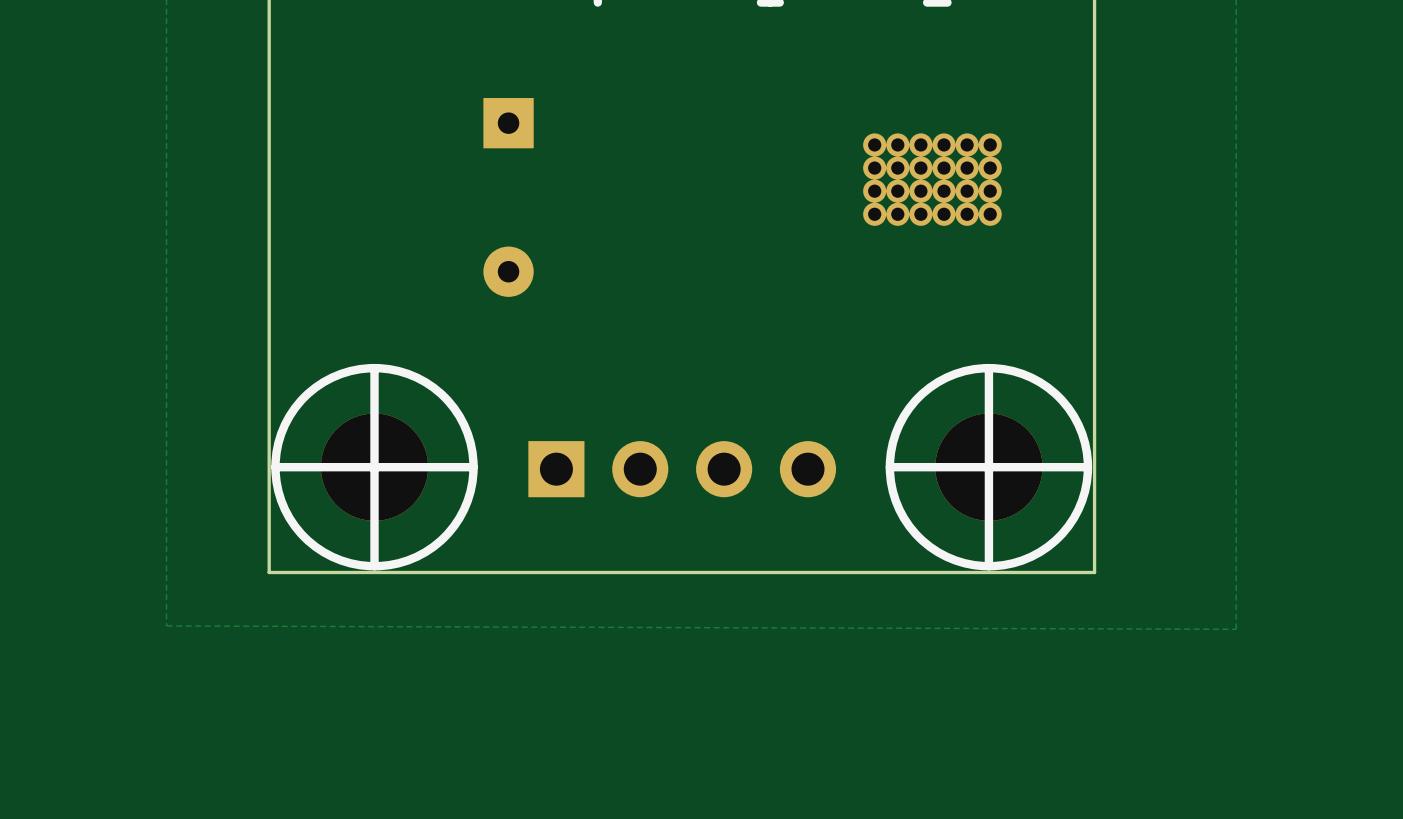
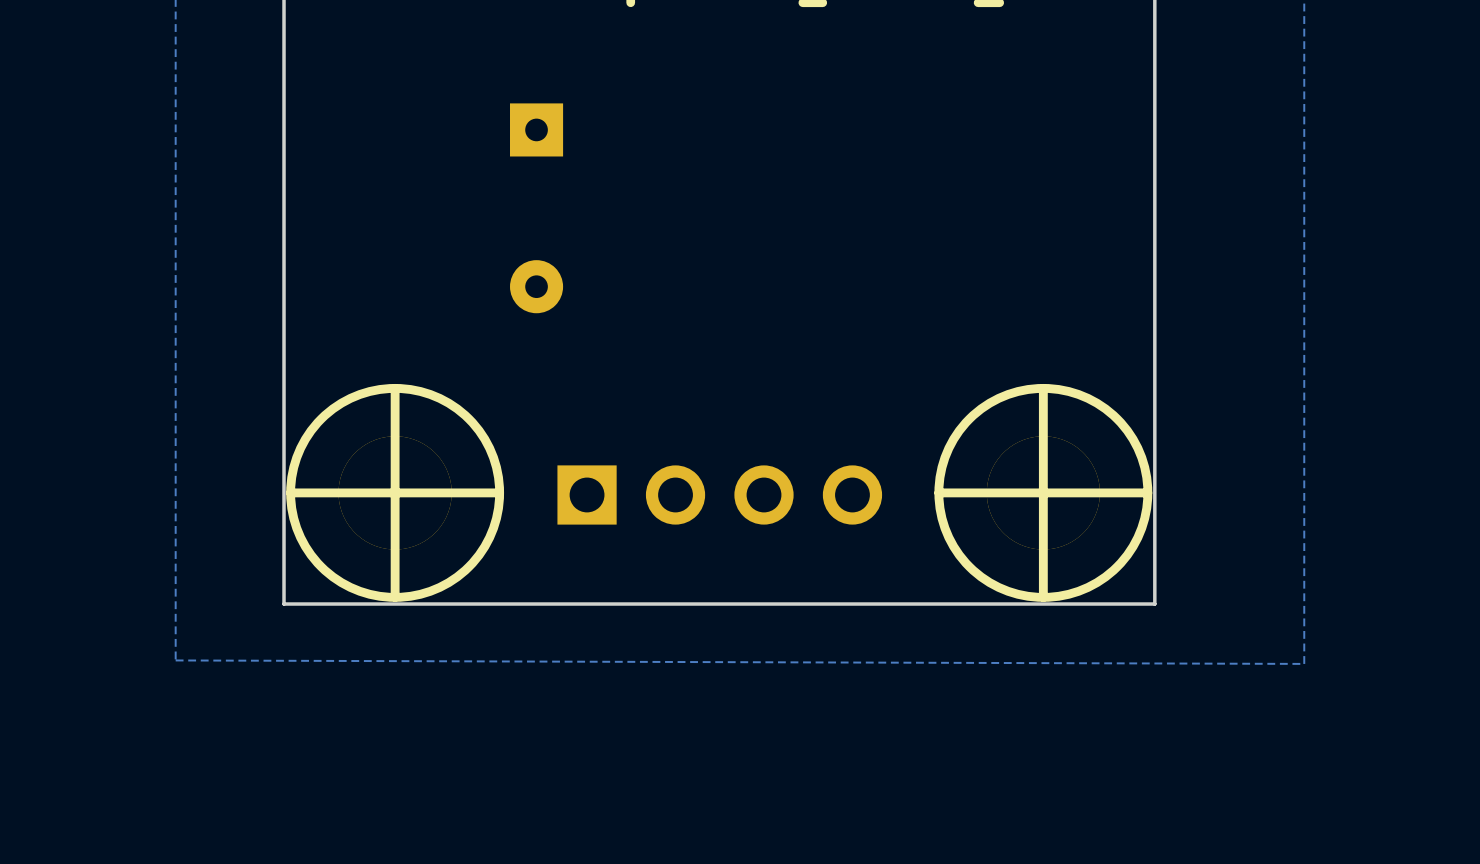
part: (932, 179) -> none

